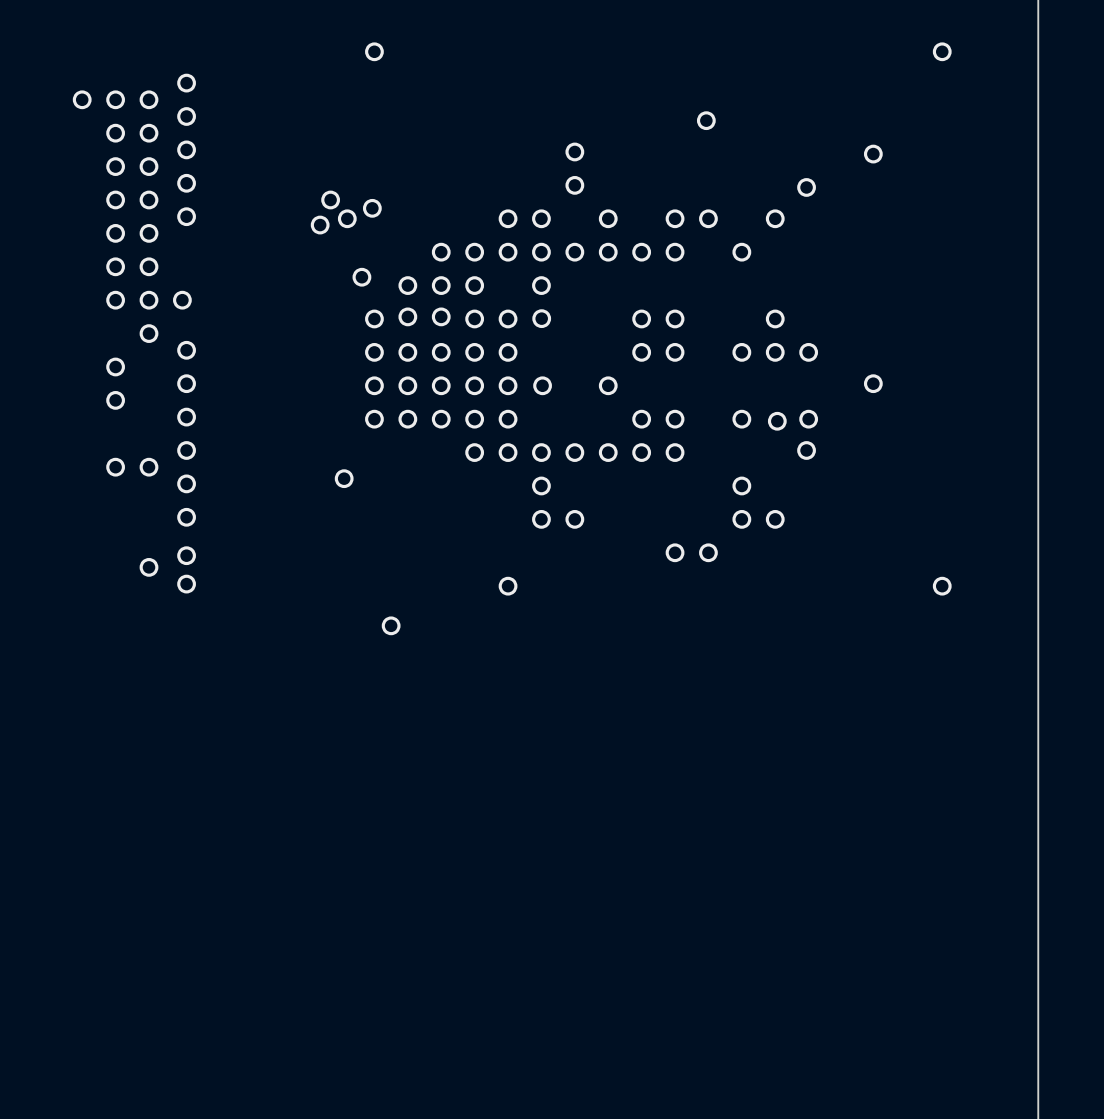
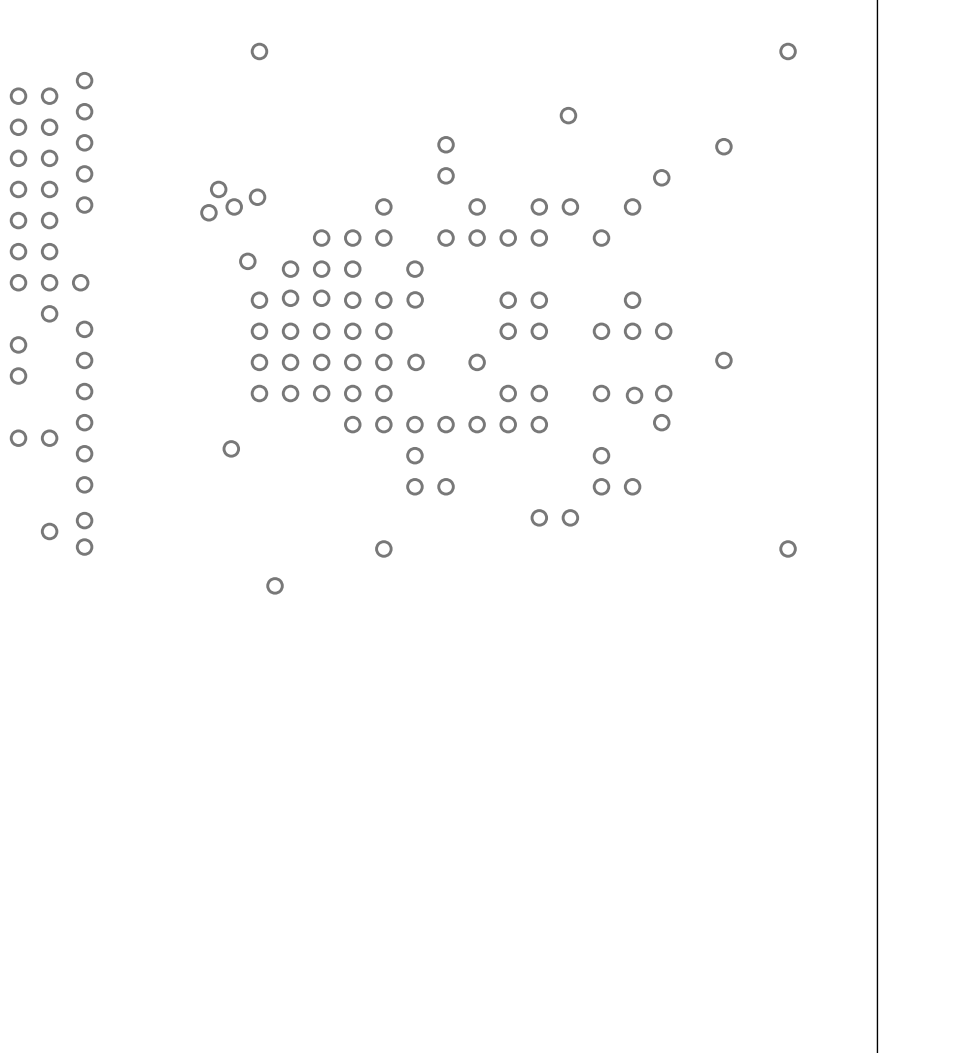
via: (541, 218) -> none
via: (541, 252) -> none

